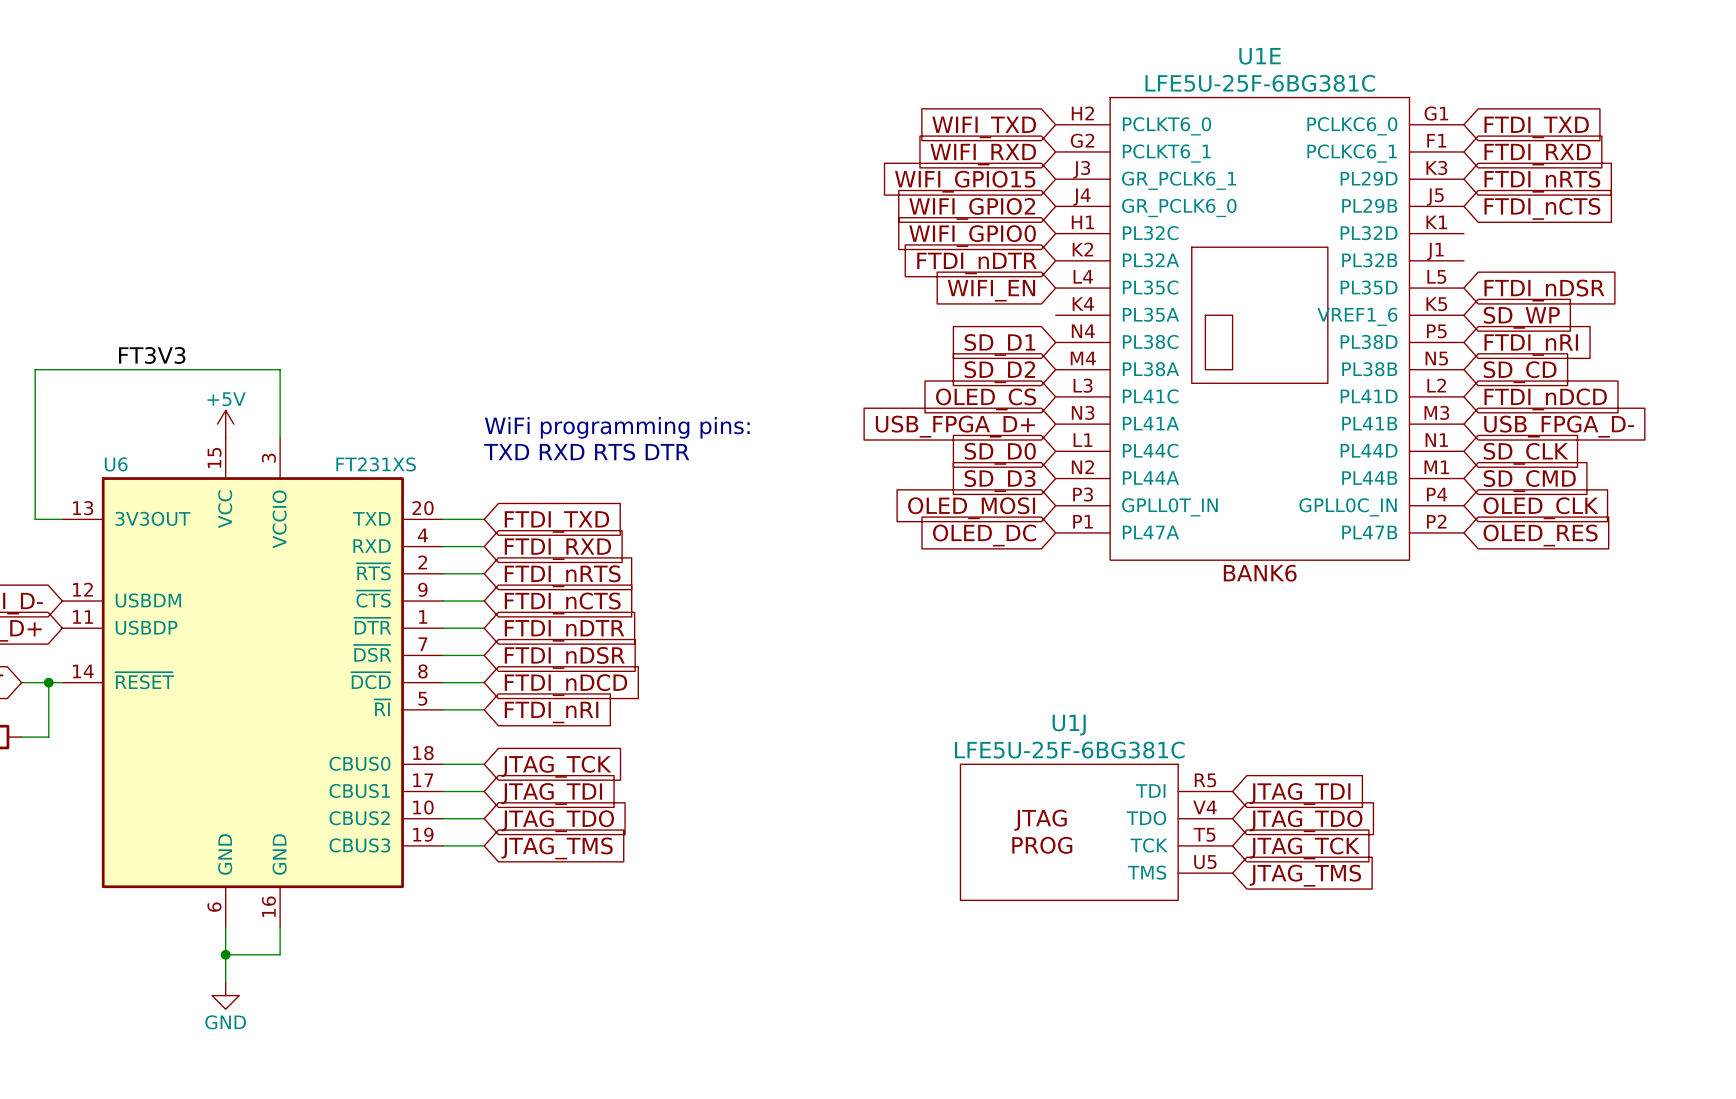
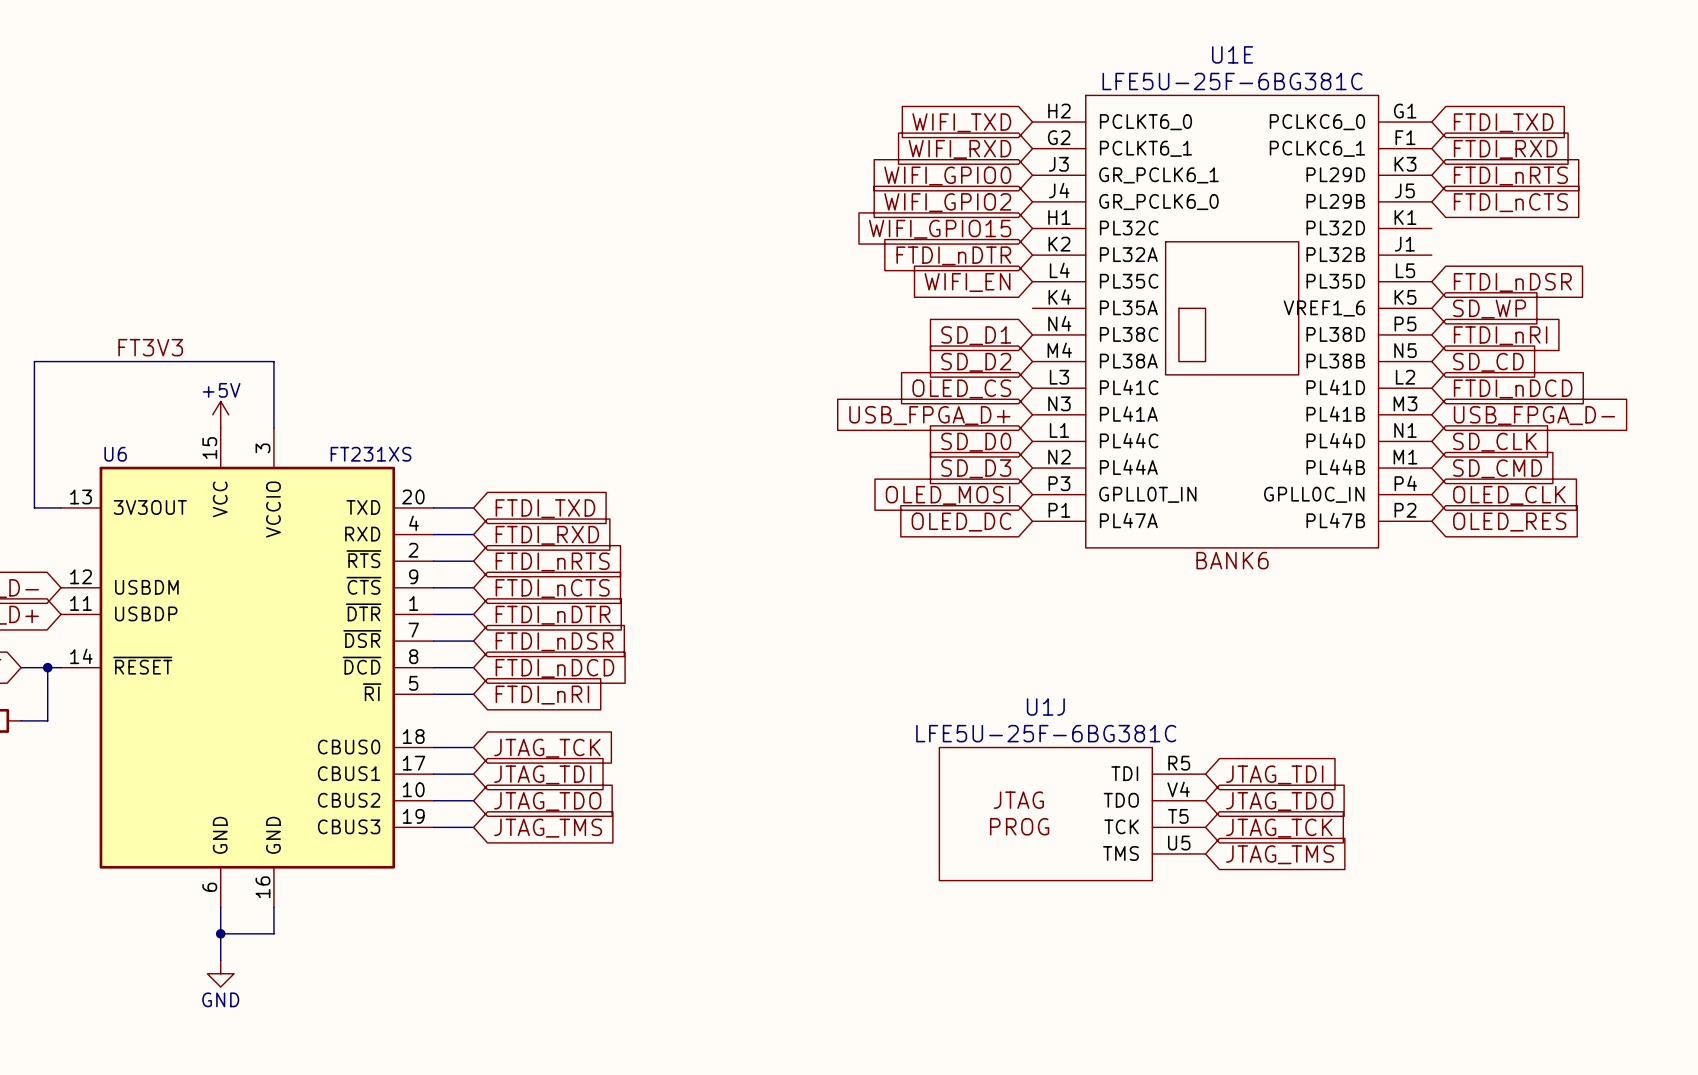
global label: WIFI_GPIO15 (965, 181) -> WIFI_GPIO0 (947, 176)
global label: WIFI_GPIO0 (972, 236) -> WIFI_GPIO15 (940, 229)
text: WiFi programming pins: (617, 427) -> none
text: TXD RXD RTS DTR (586, 452) -> none

